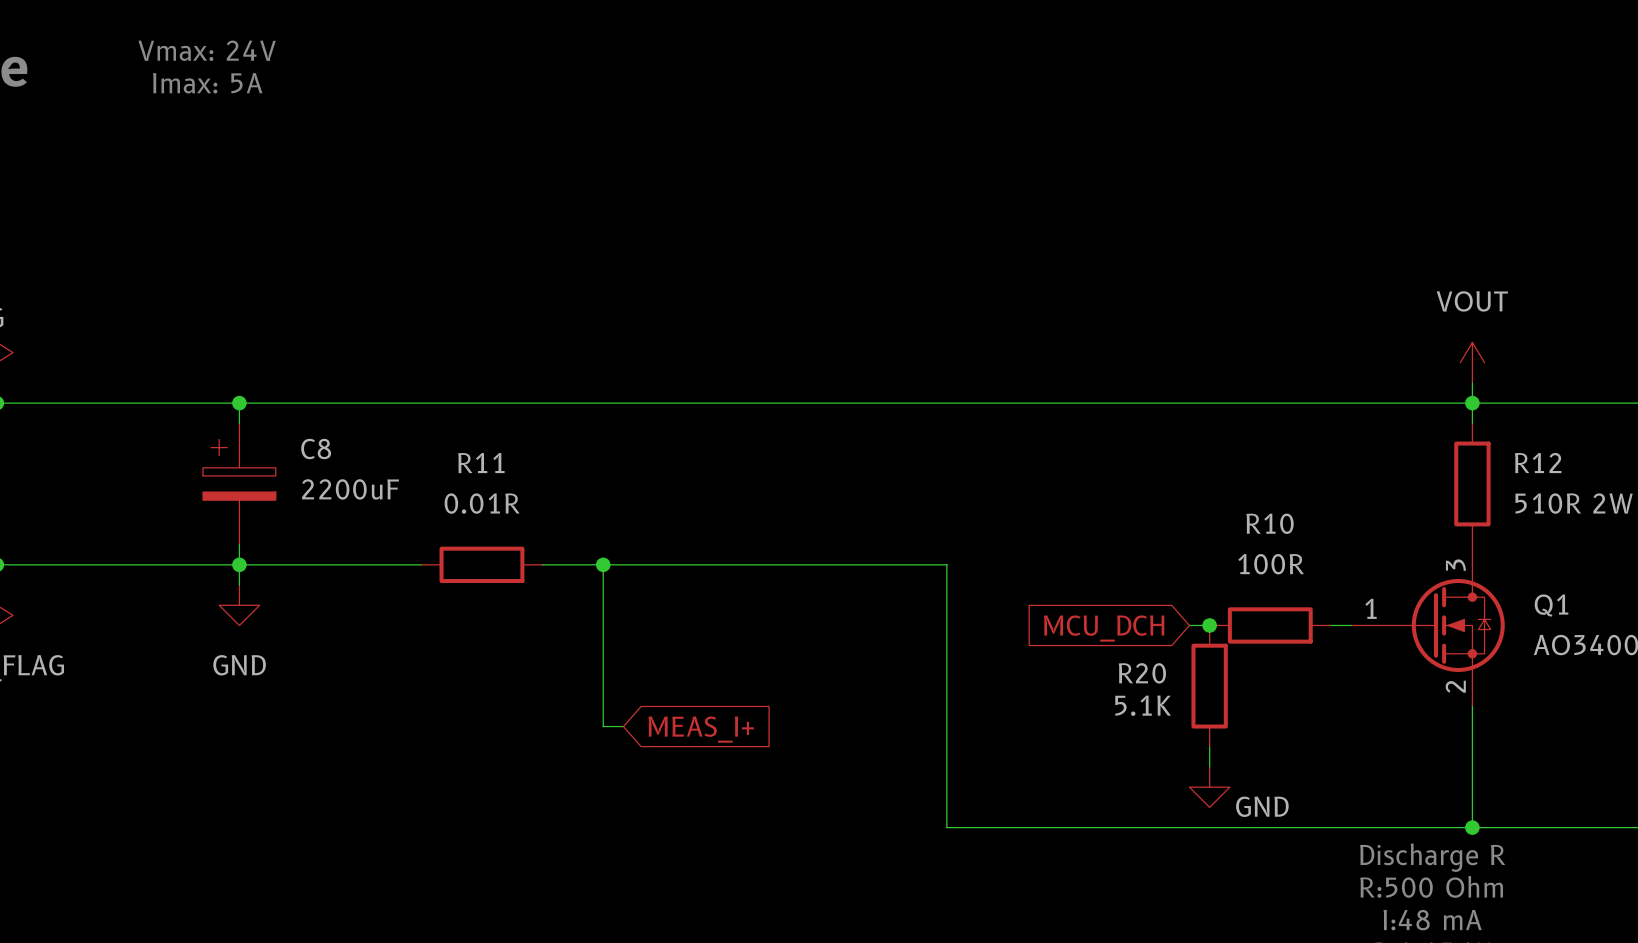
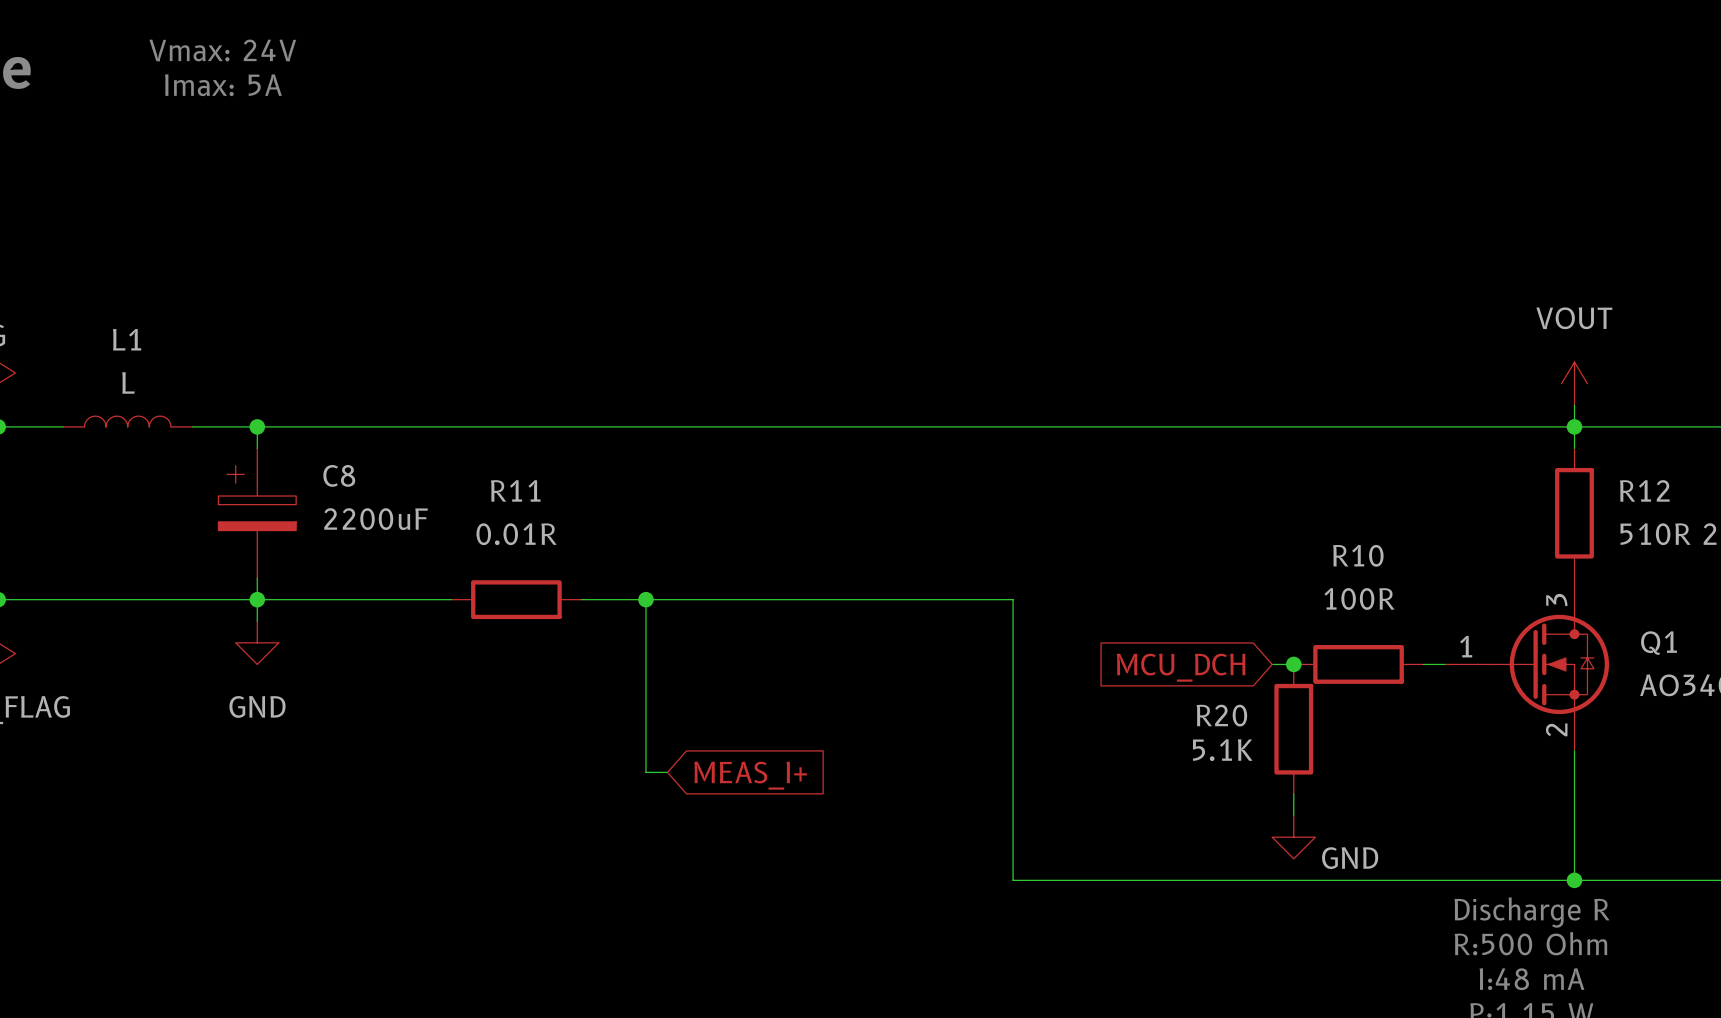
L1: none -> L (127, 421)
wire: (57, 403) (178, 403) -> none

